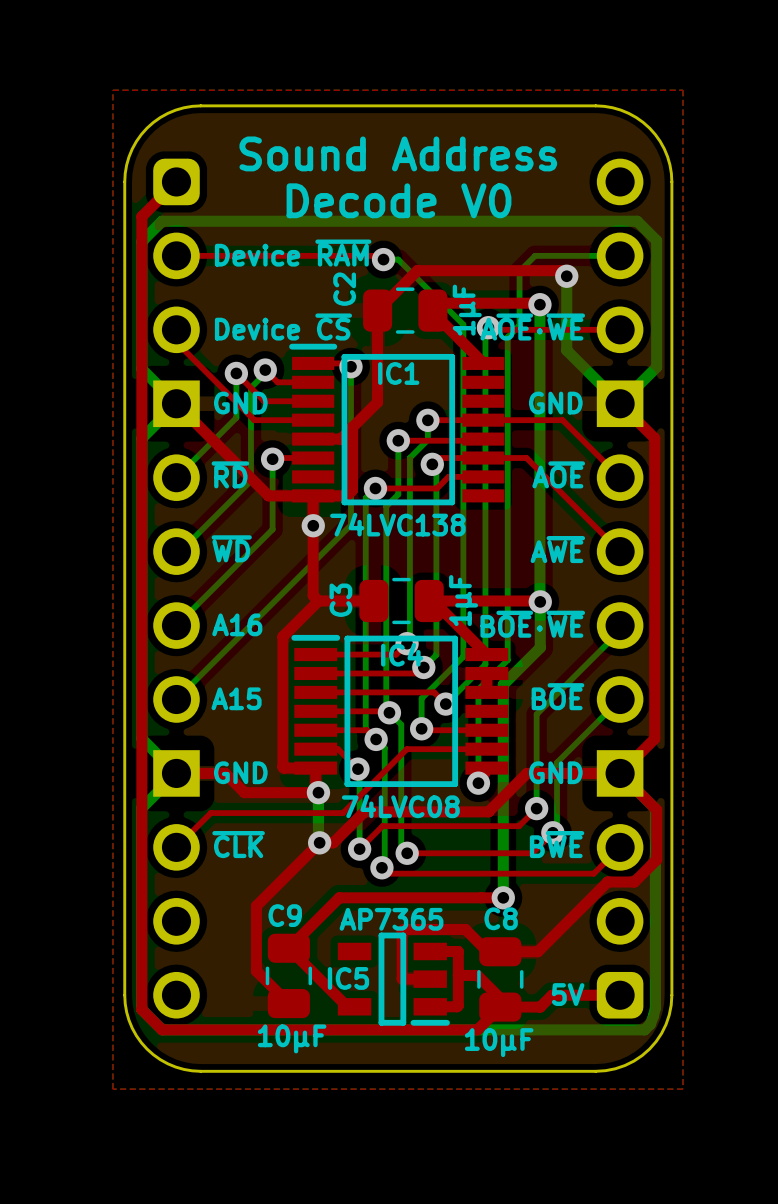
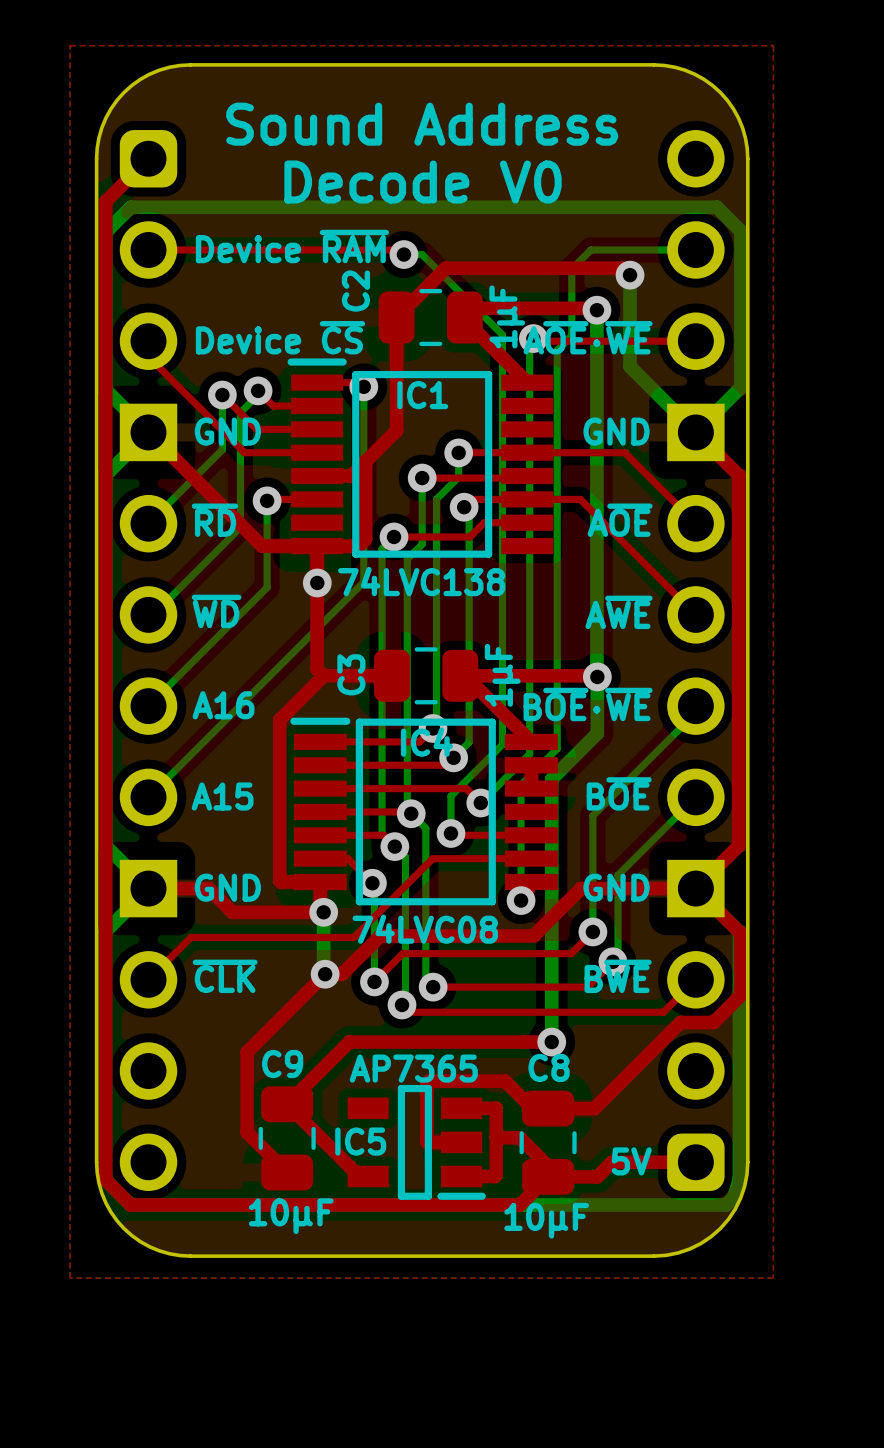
part footprint: [123, 104, 674, 1073] -> [94, 63, 750, 1258]

